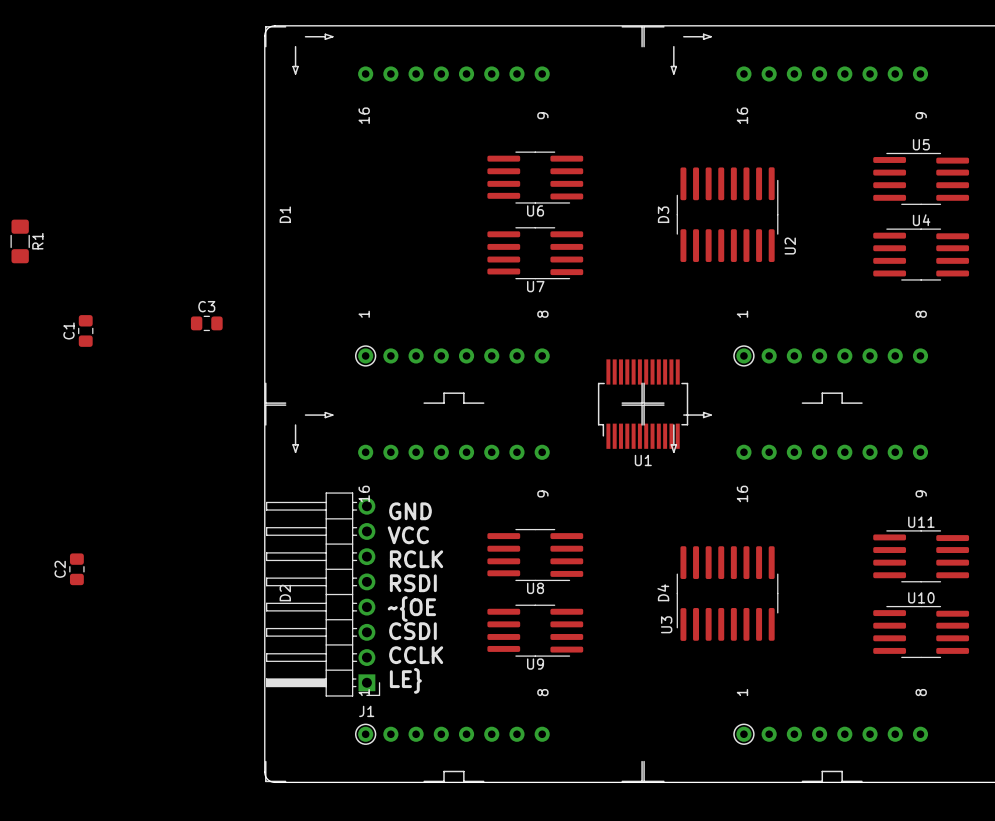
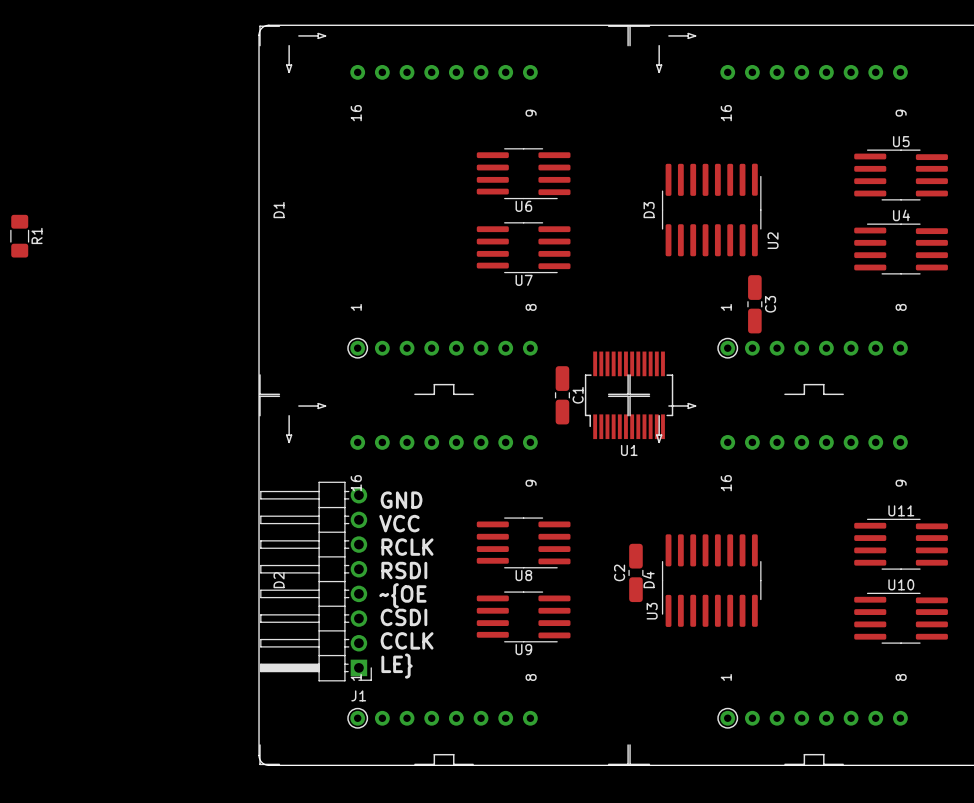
C3 name position: C3 (206, 306) -> C3 (770, 304)
C1 footprint: [78, 315, 94, 347] -> [554, 366, 570, 425]
C3 footprint: [190, 315, 223, 332] -> [747, 275, 763, 334]
C1 name position: C1 (68, 330) -> C1 (578, 395)
C2 footprint: [69, 553, 85, 586] -> [628, 543, 644, 603]

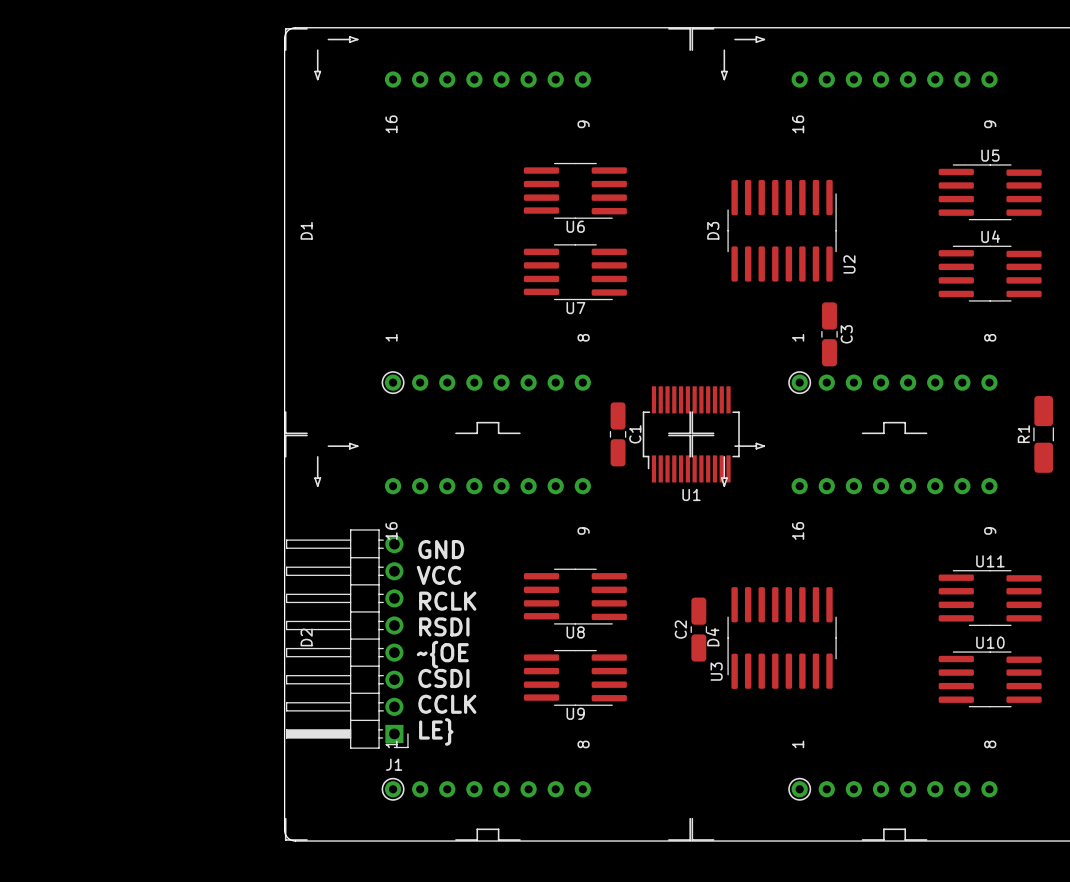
R1 footprint: [10, 214, 30, 258] -> [1033, 395, 1055, 473]
R1 name position: R1 (37, 235) -> R1 (1023, 434)

